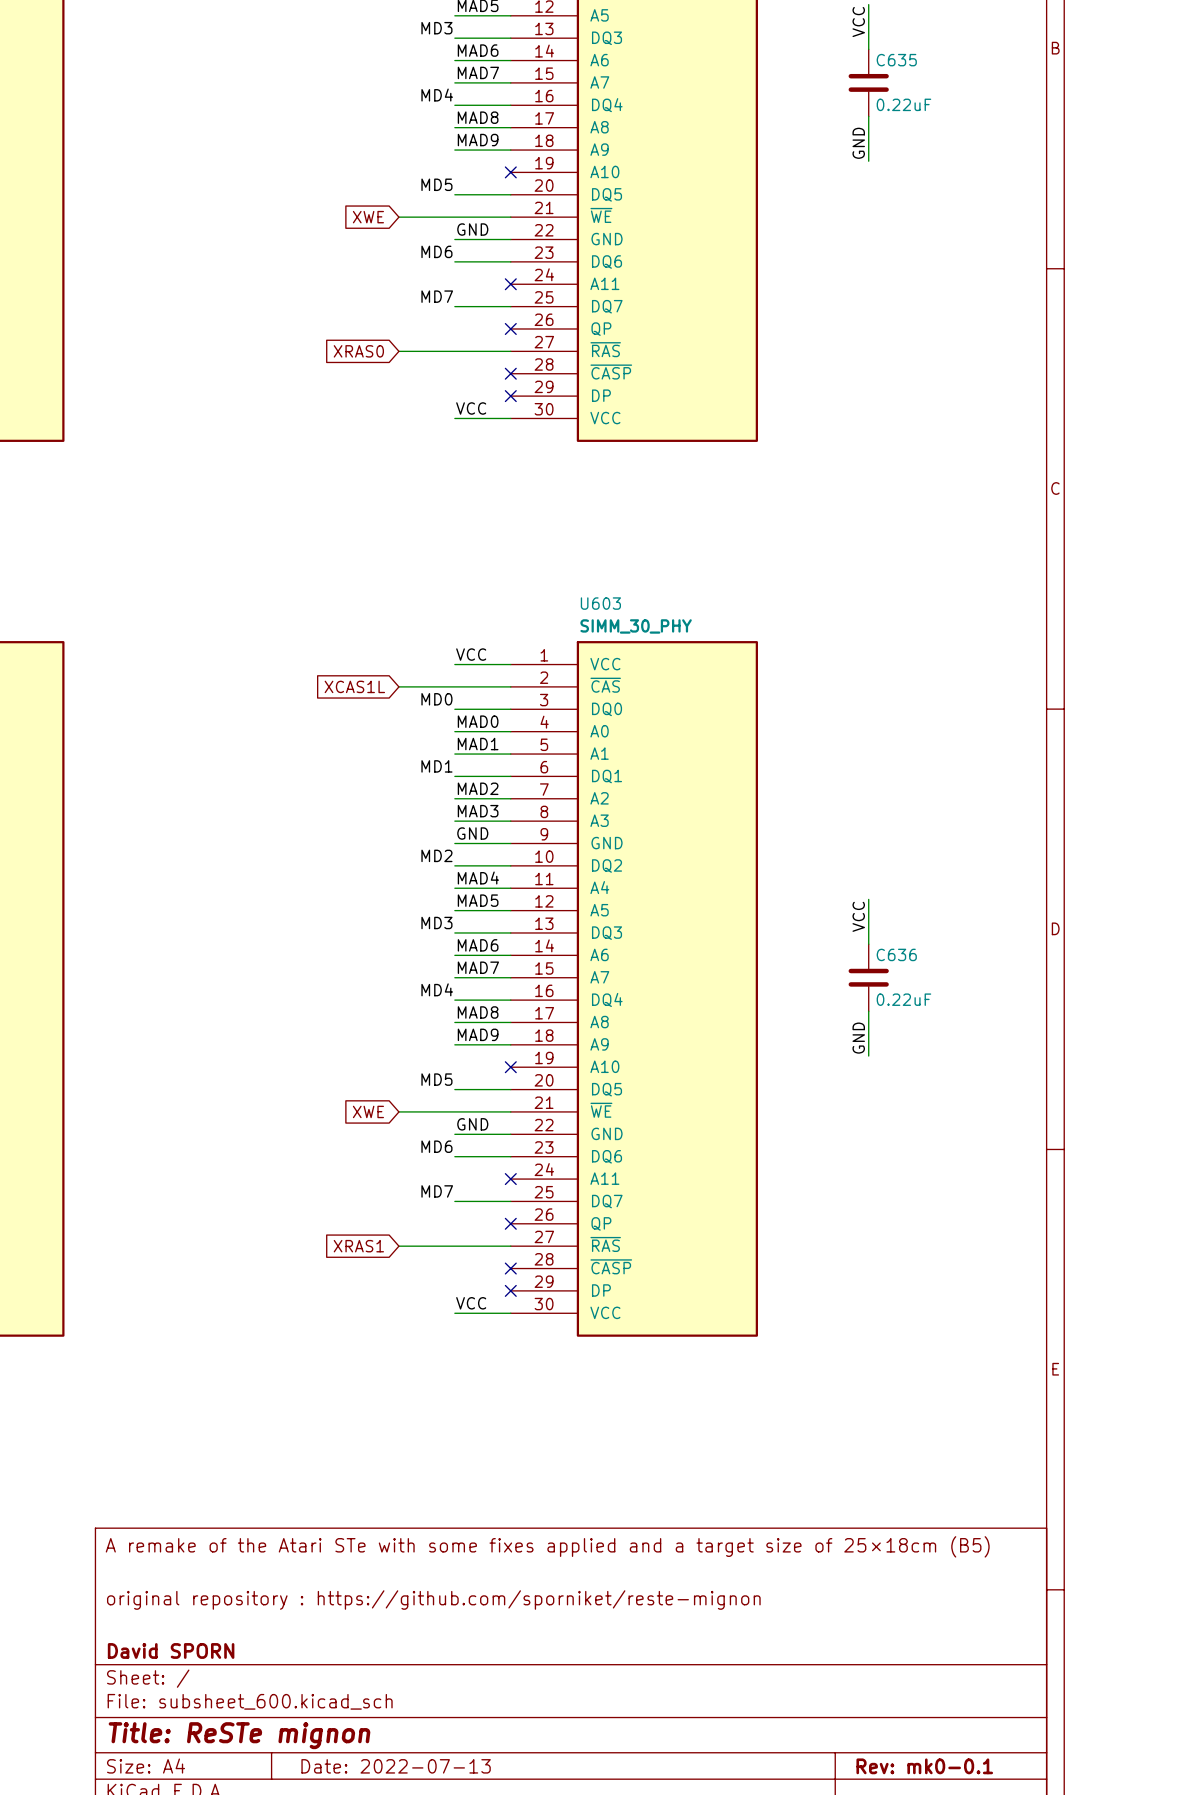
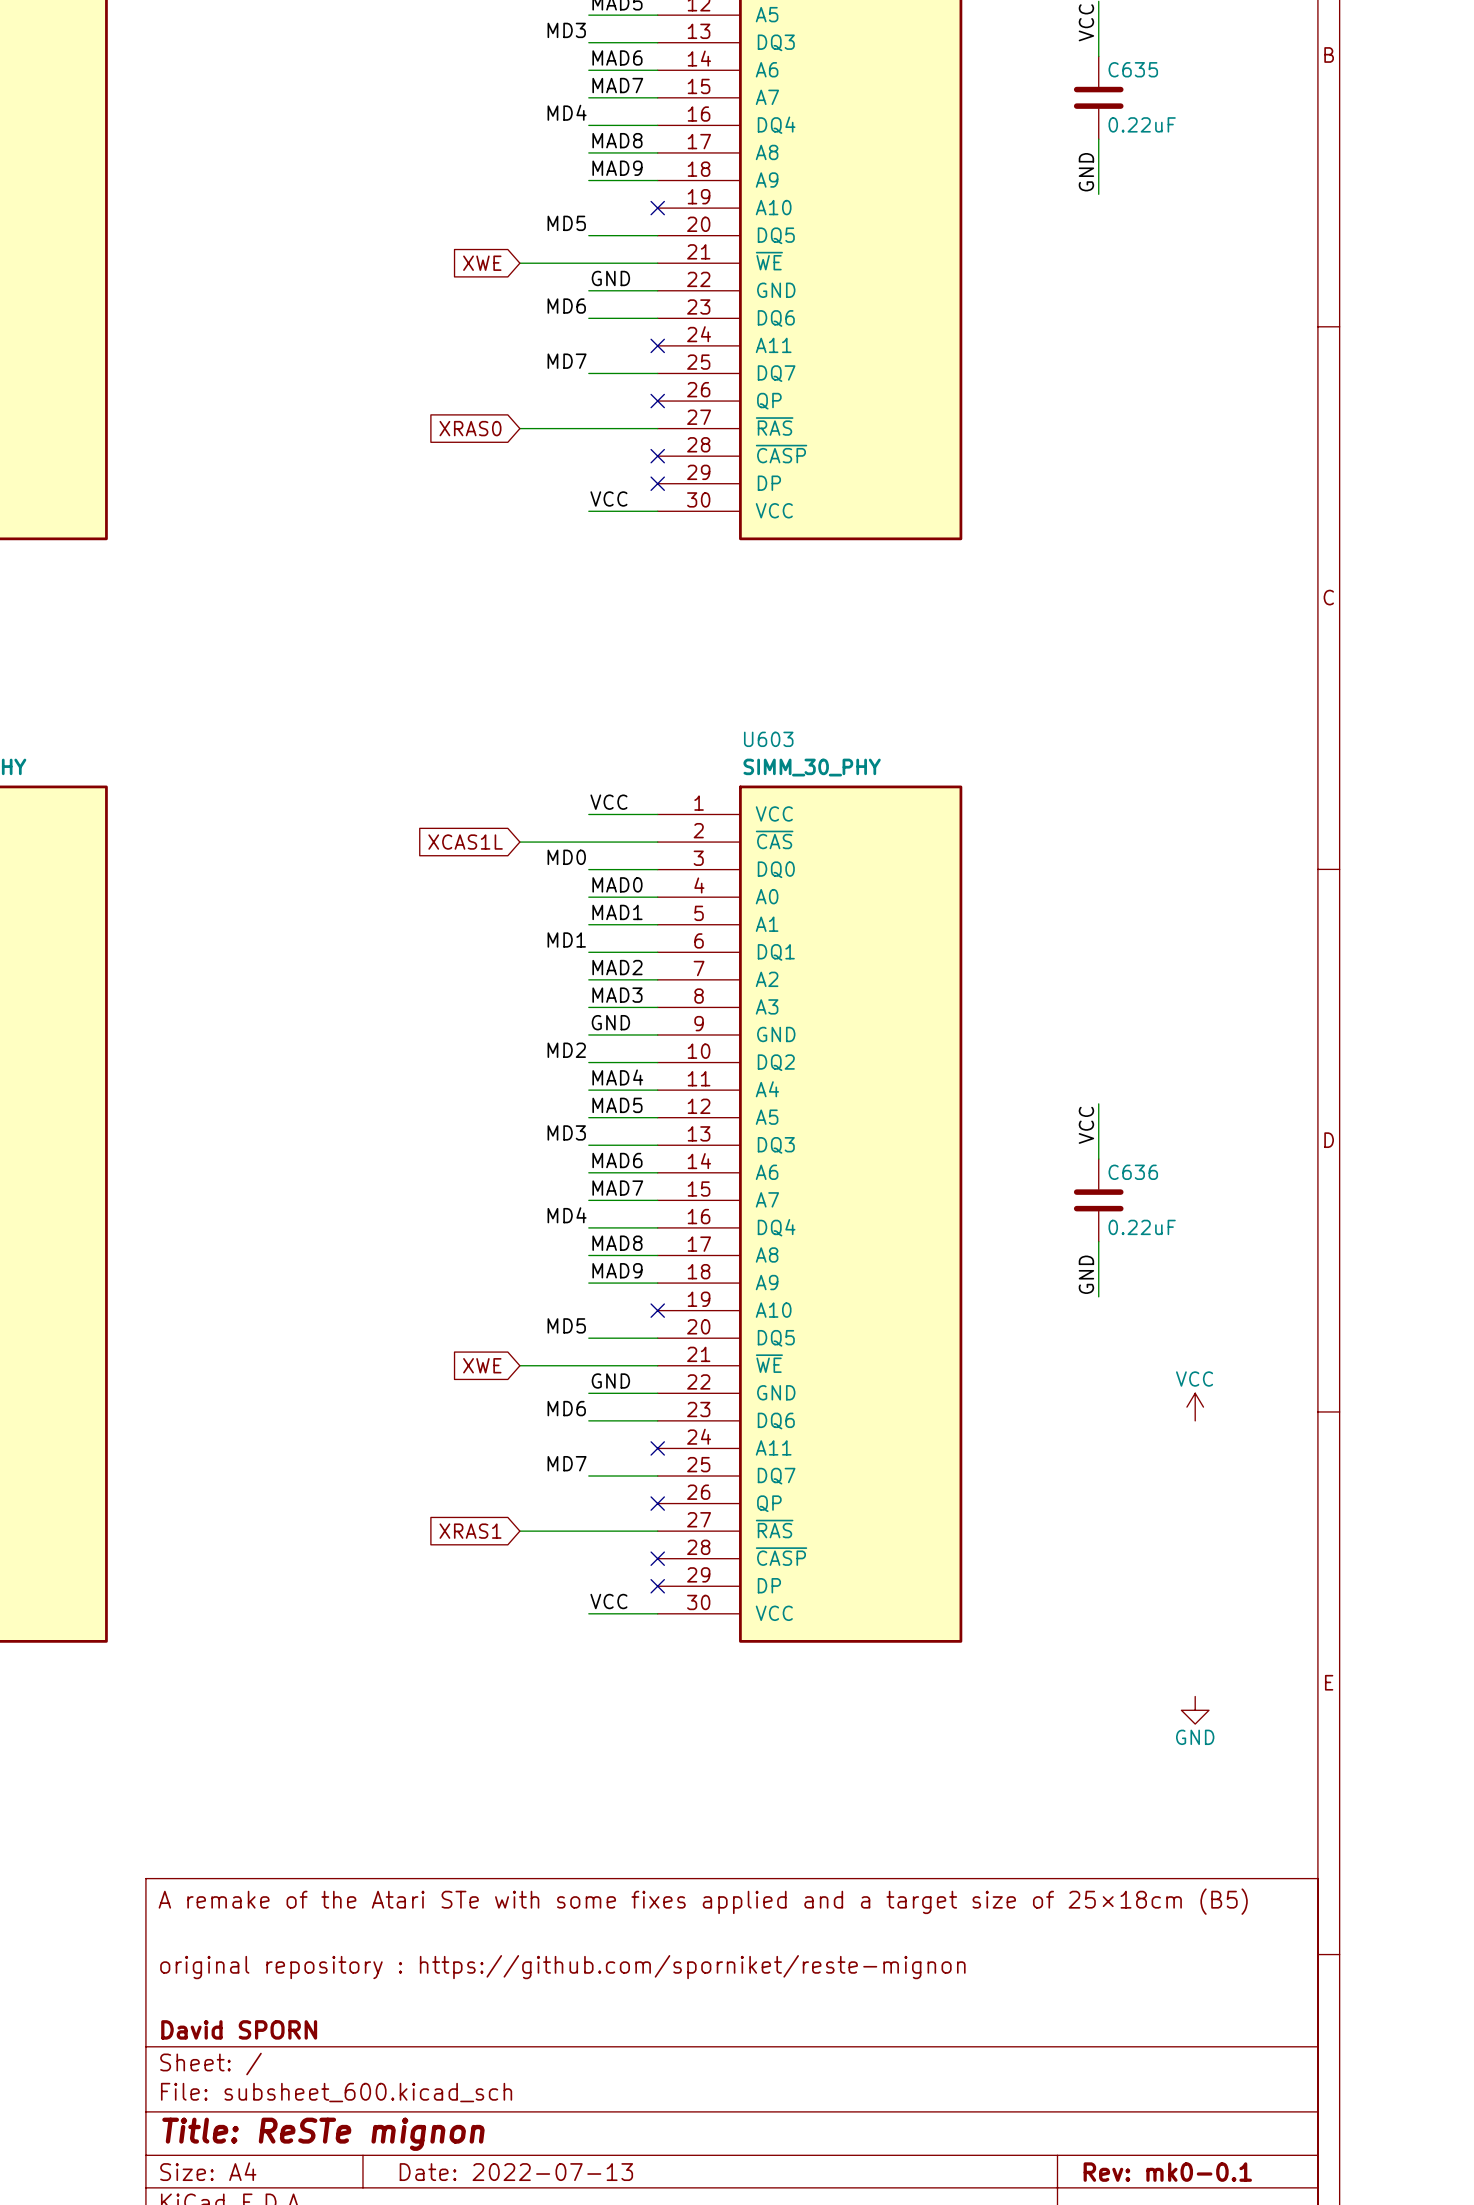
power symbol: none -> VCC (1195, 1407)
power symbol: none -> GND (1195, 1710)

